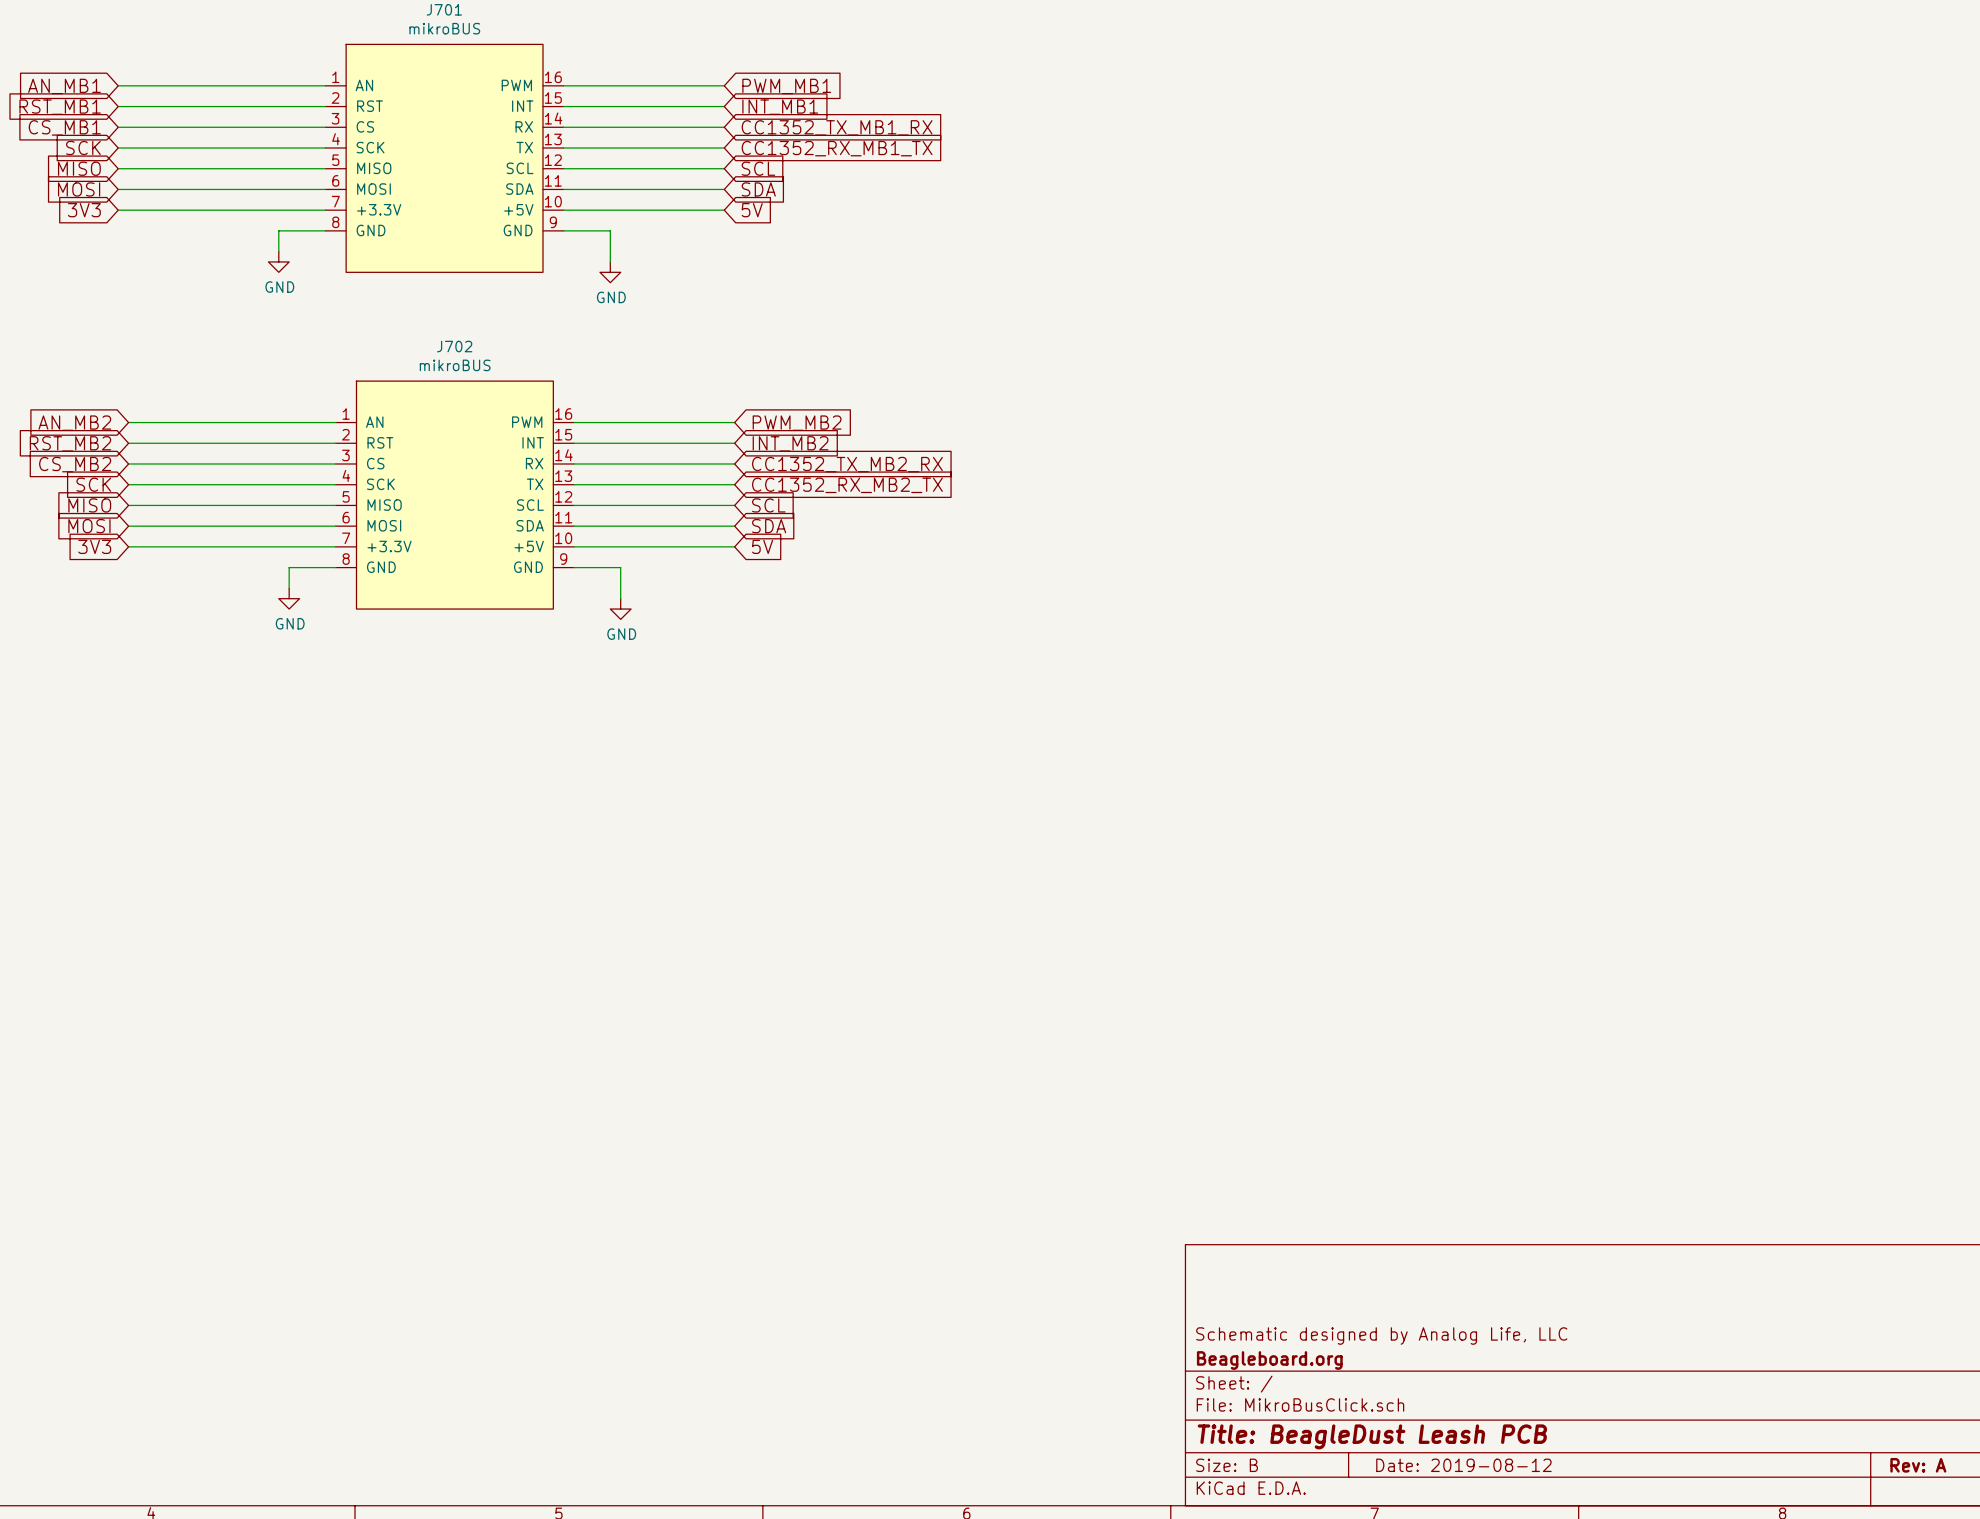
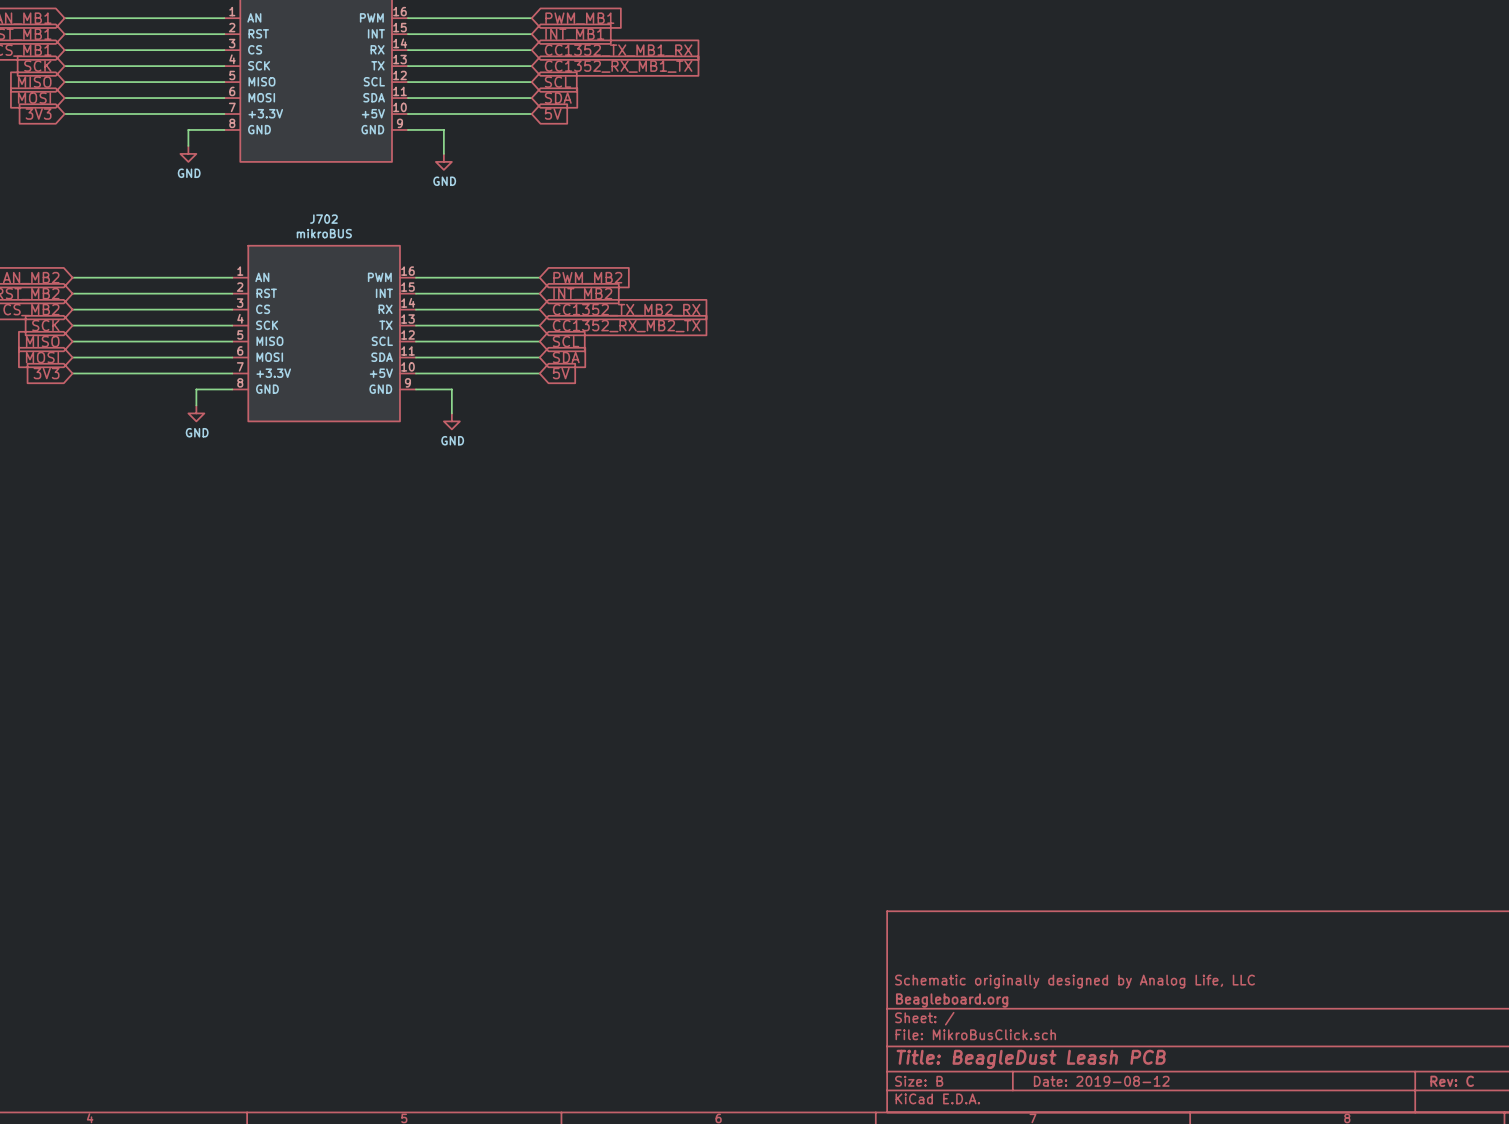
title block: Schematic designed by Analog Life, LLC (1381, 1336) -> Schematic originally designed by Analog Life, LLC (1075, 981)
title block: Rev: A (1918, 1465) -> Rev: C (1452, 1081)

